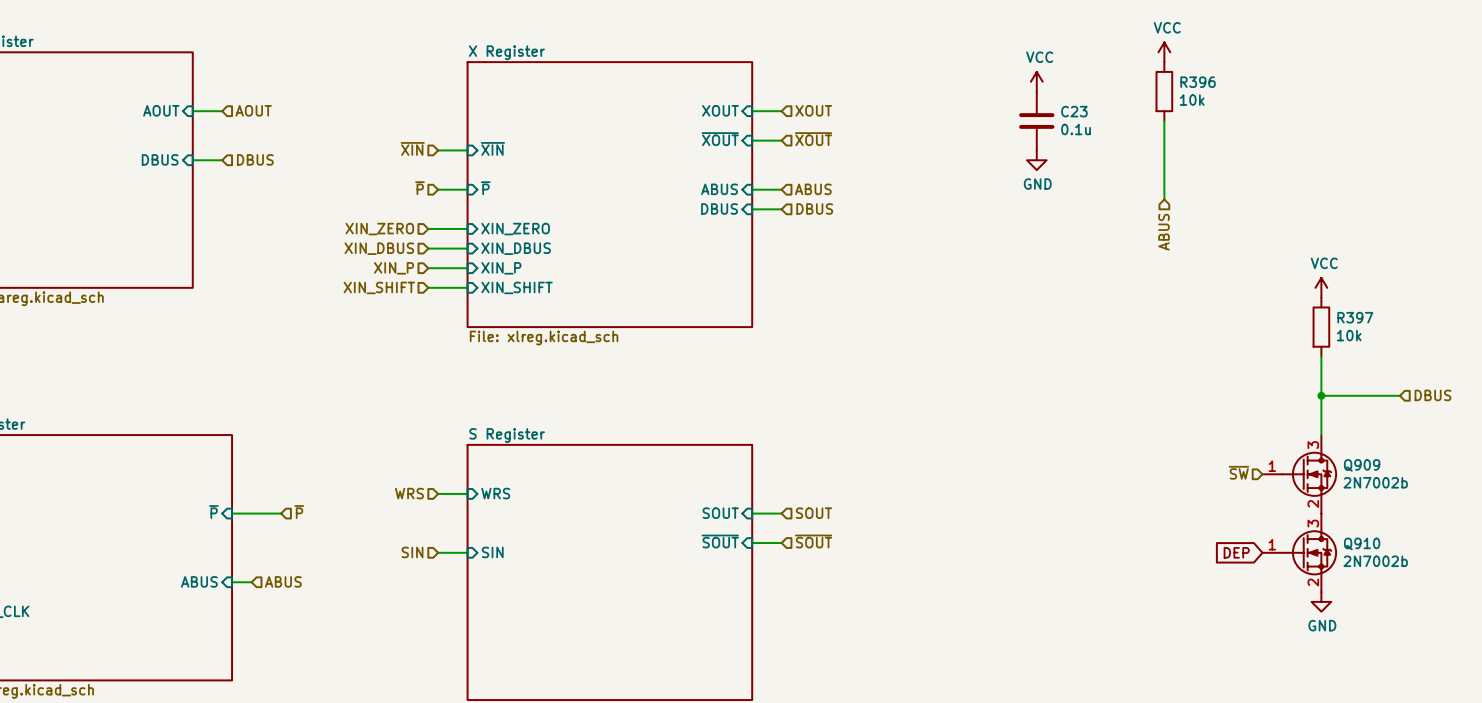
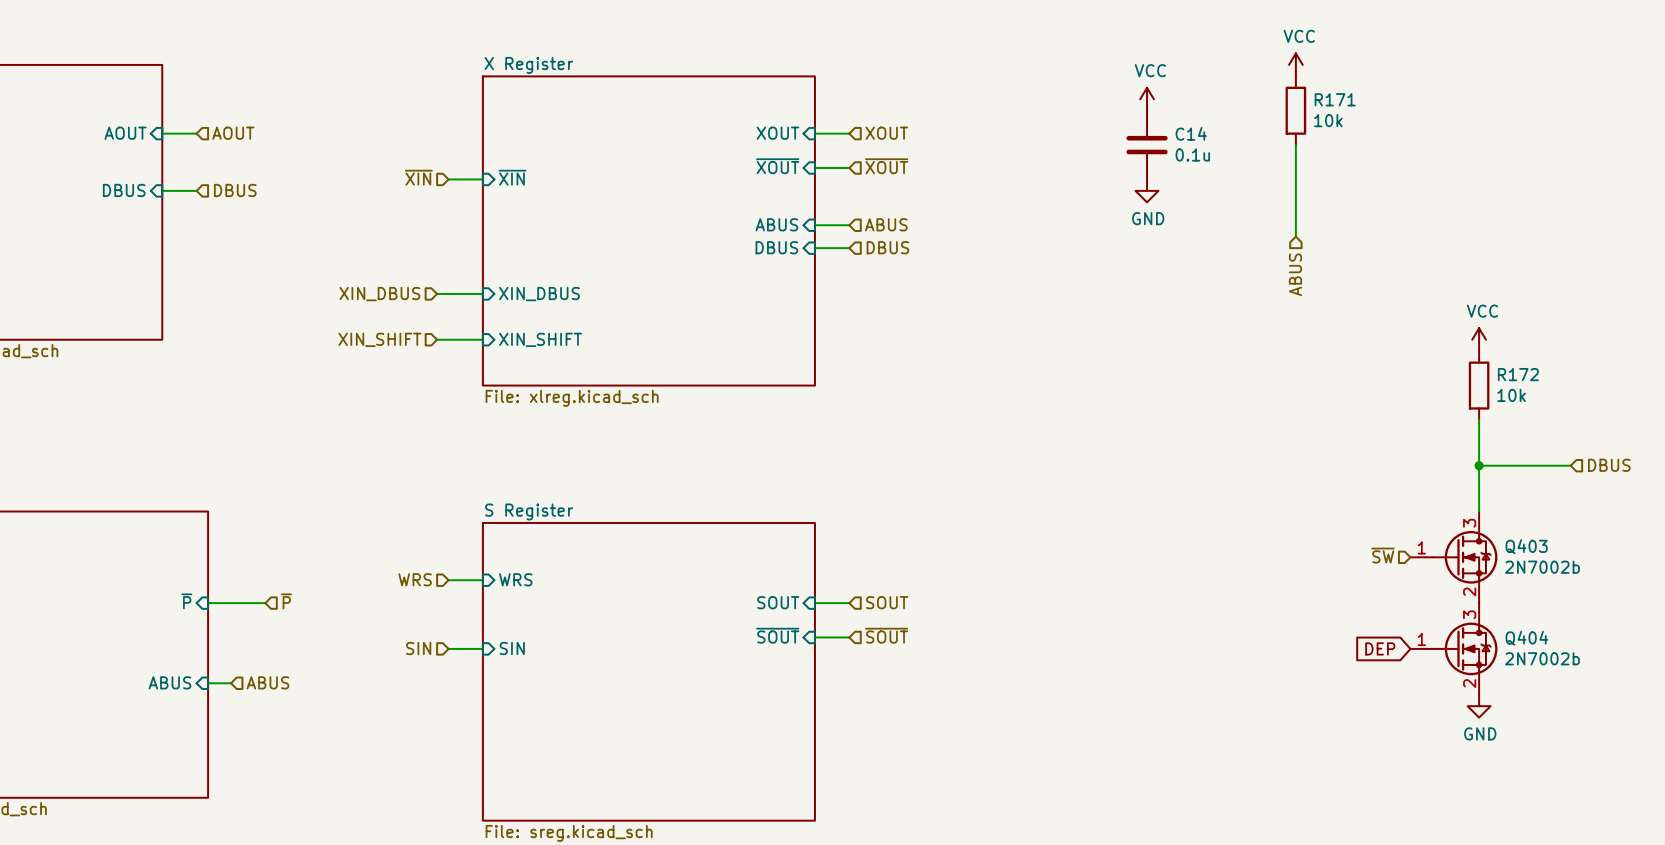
R396 name: R396 (1198, 82) -> R171 (1335, 99)
C23 name: C23 (1074, 111) -> C14 (1191, 133)
hierarchical label: ~{P} (419, 188) -> none
sheet pin: ~{P} (485, 188) -> none
wire: (438, 189) (467, 189) -> none
wire: (428, 228) (467, 228) -> none
hierarchical label: XIN_ZERO (379, 229) -> none
sheet pin: XIN_ZERO (515, 229) -> none
hierarchical label: XIN_P (394, 268) -> none
wire: (428, 268) (467, 268) -> none
sheet pin: XIN_P (501, 268) -> none
R397 name: R397 (1355, 317) -> R172 (1518, 374)
Q909 name: Q909 (1362, 465) -> Q403 (1526, 546)
Q910 name: Q910 (1362, 543) -> Q404 (1526, 638)

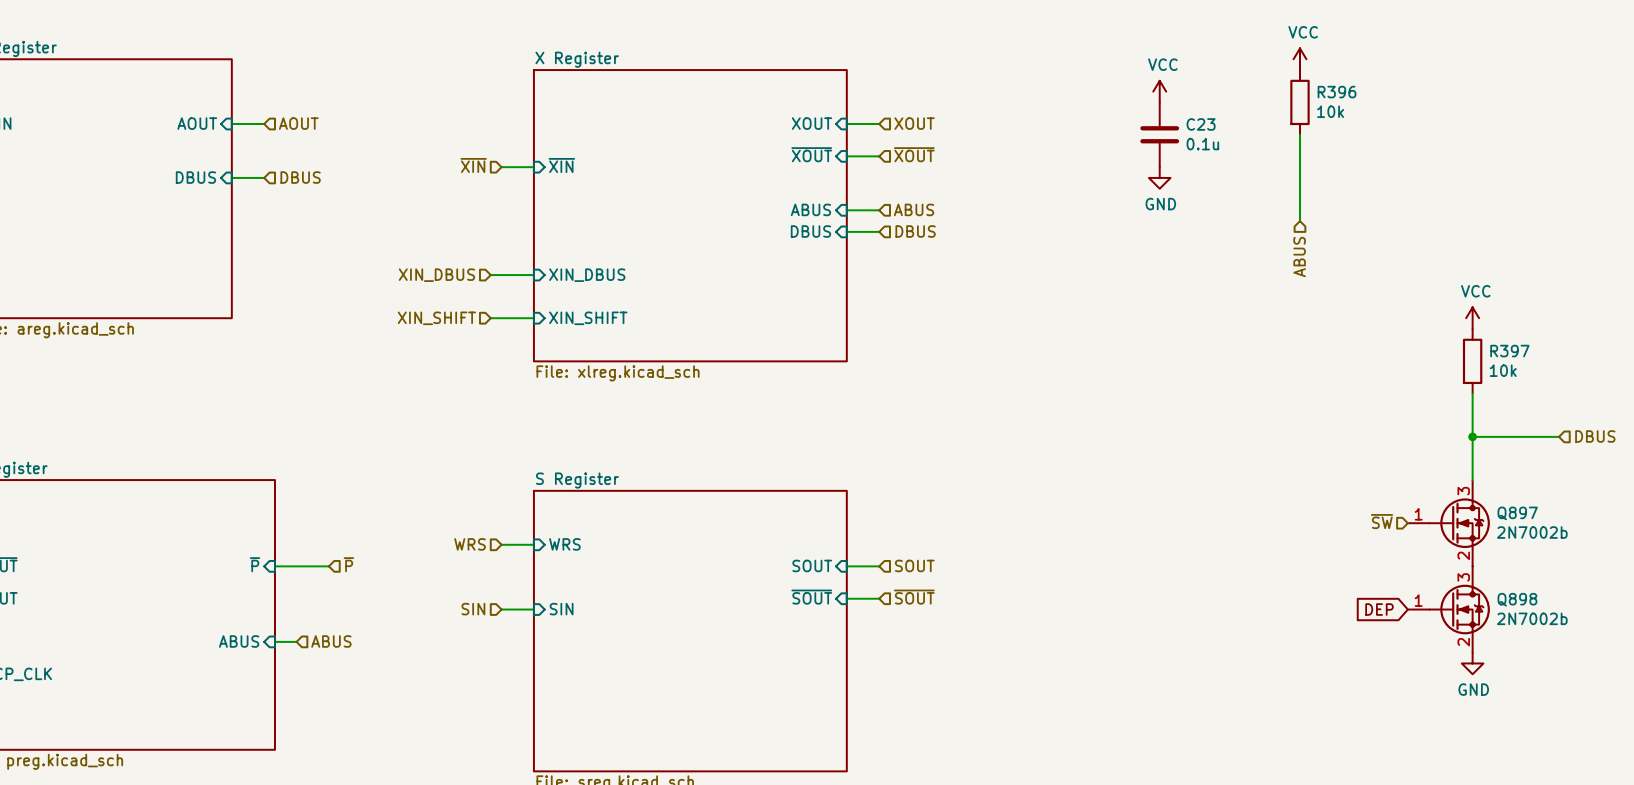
R171 name: R171 (1335, 99) -> R396 (1337, 92)
C14 name: C14 (1191, 133) -> C23 (1201, 124)
R172 name: R172 (1518, 374) -> R397 (1509, 351)
Q403 name: Q403 (1526, 546) -> Q897 (1517, 513)
Q404 name: Q404 (1526, 638) -> Q898 (1517, 599)

